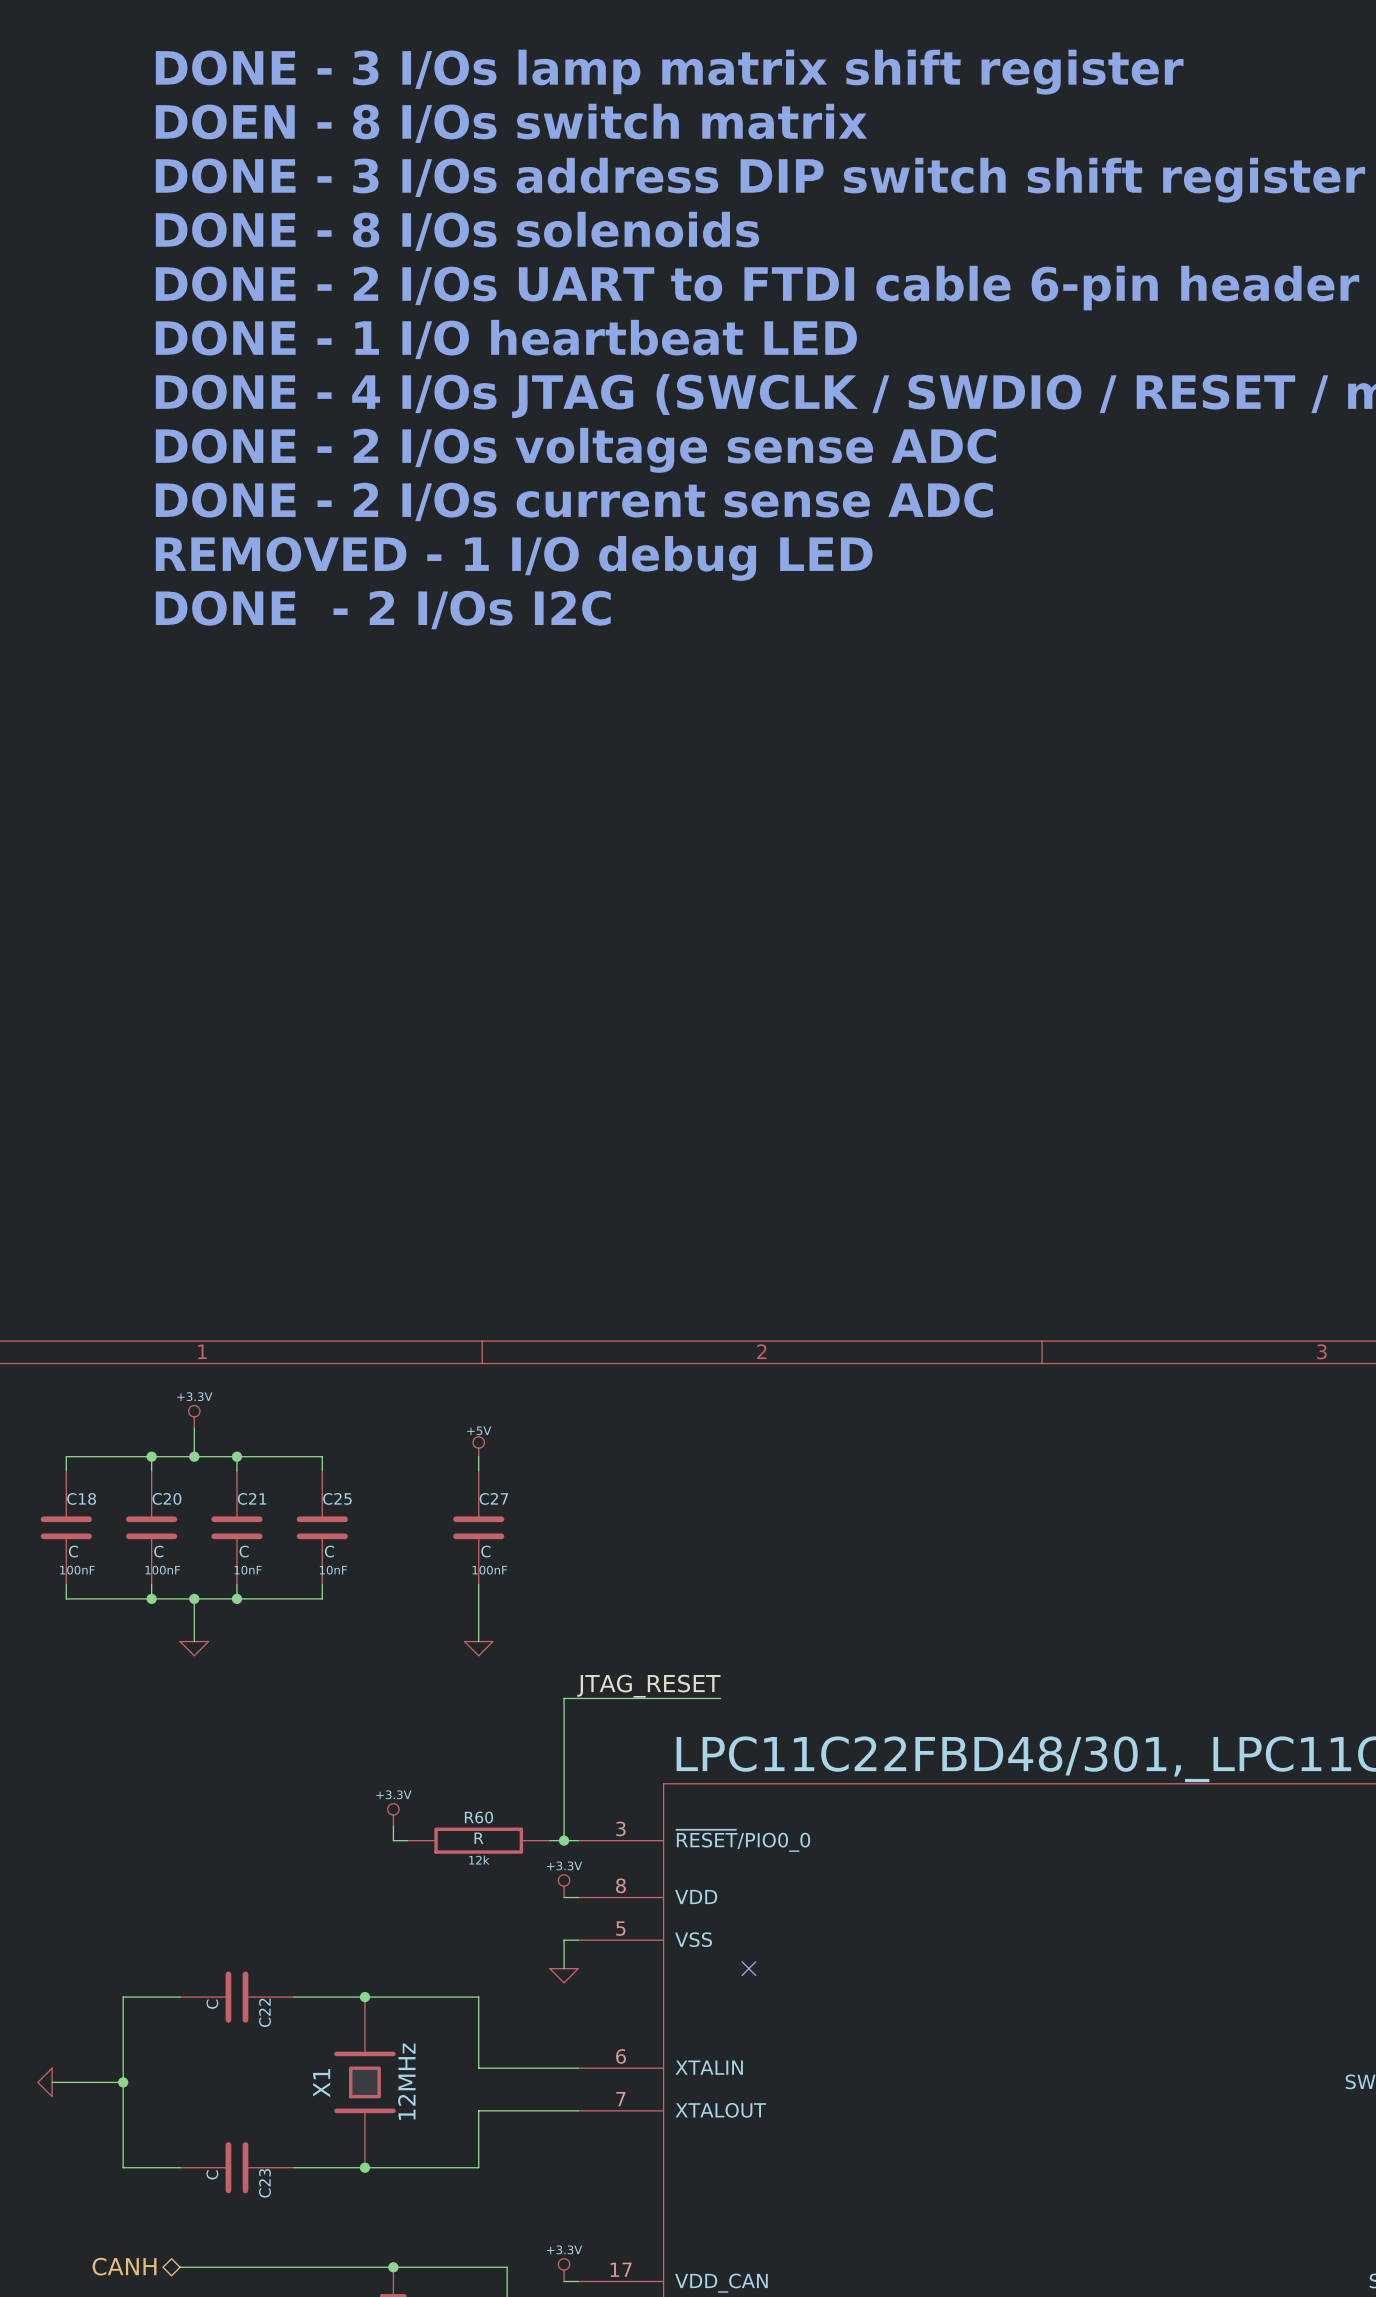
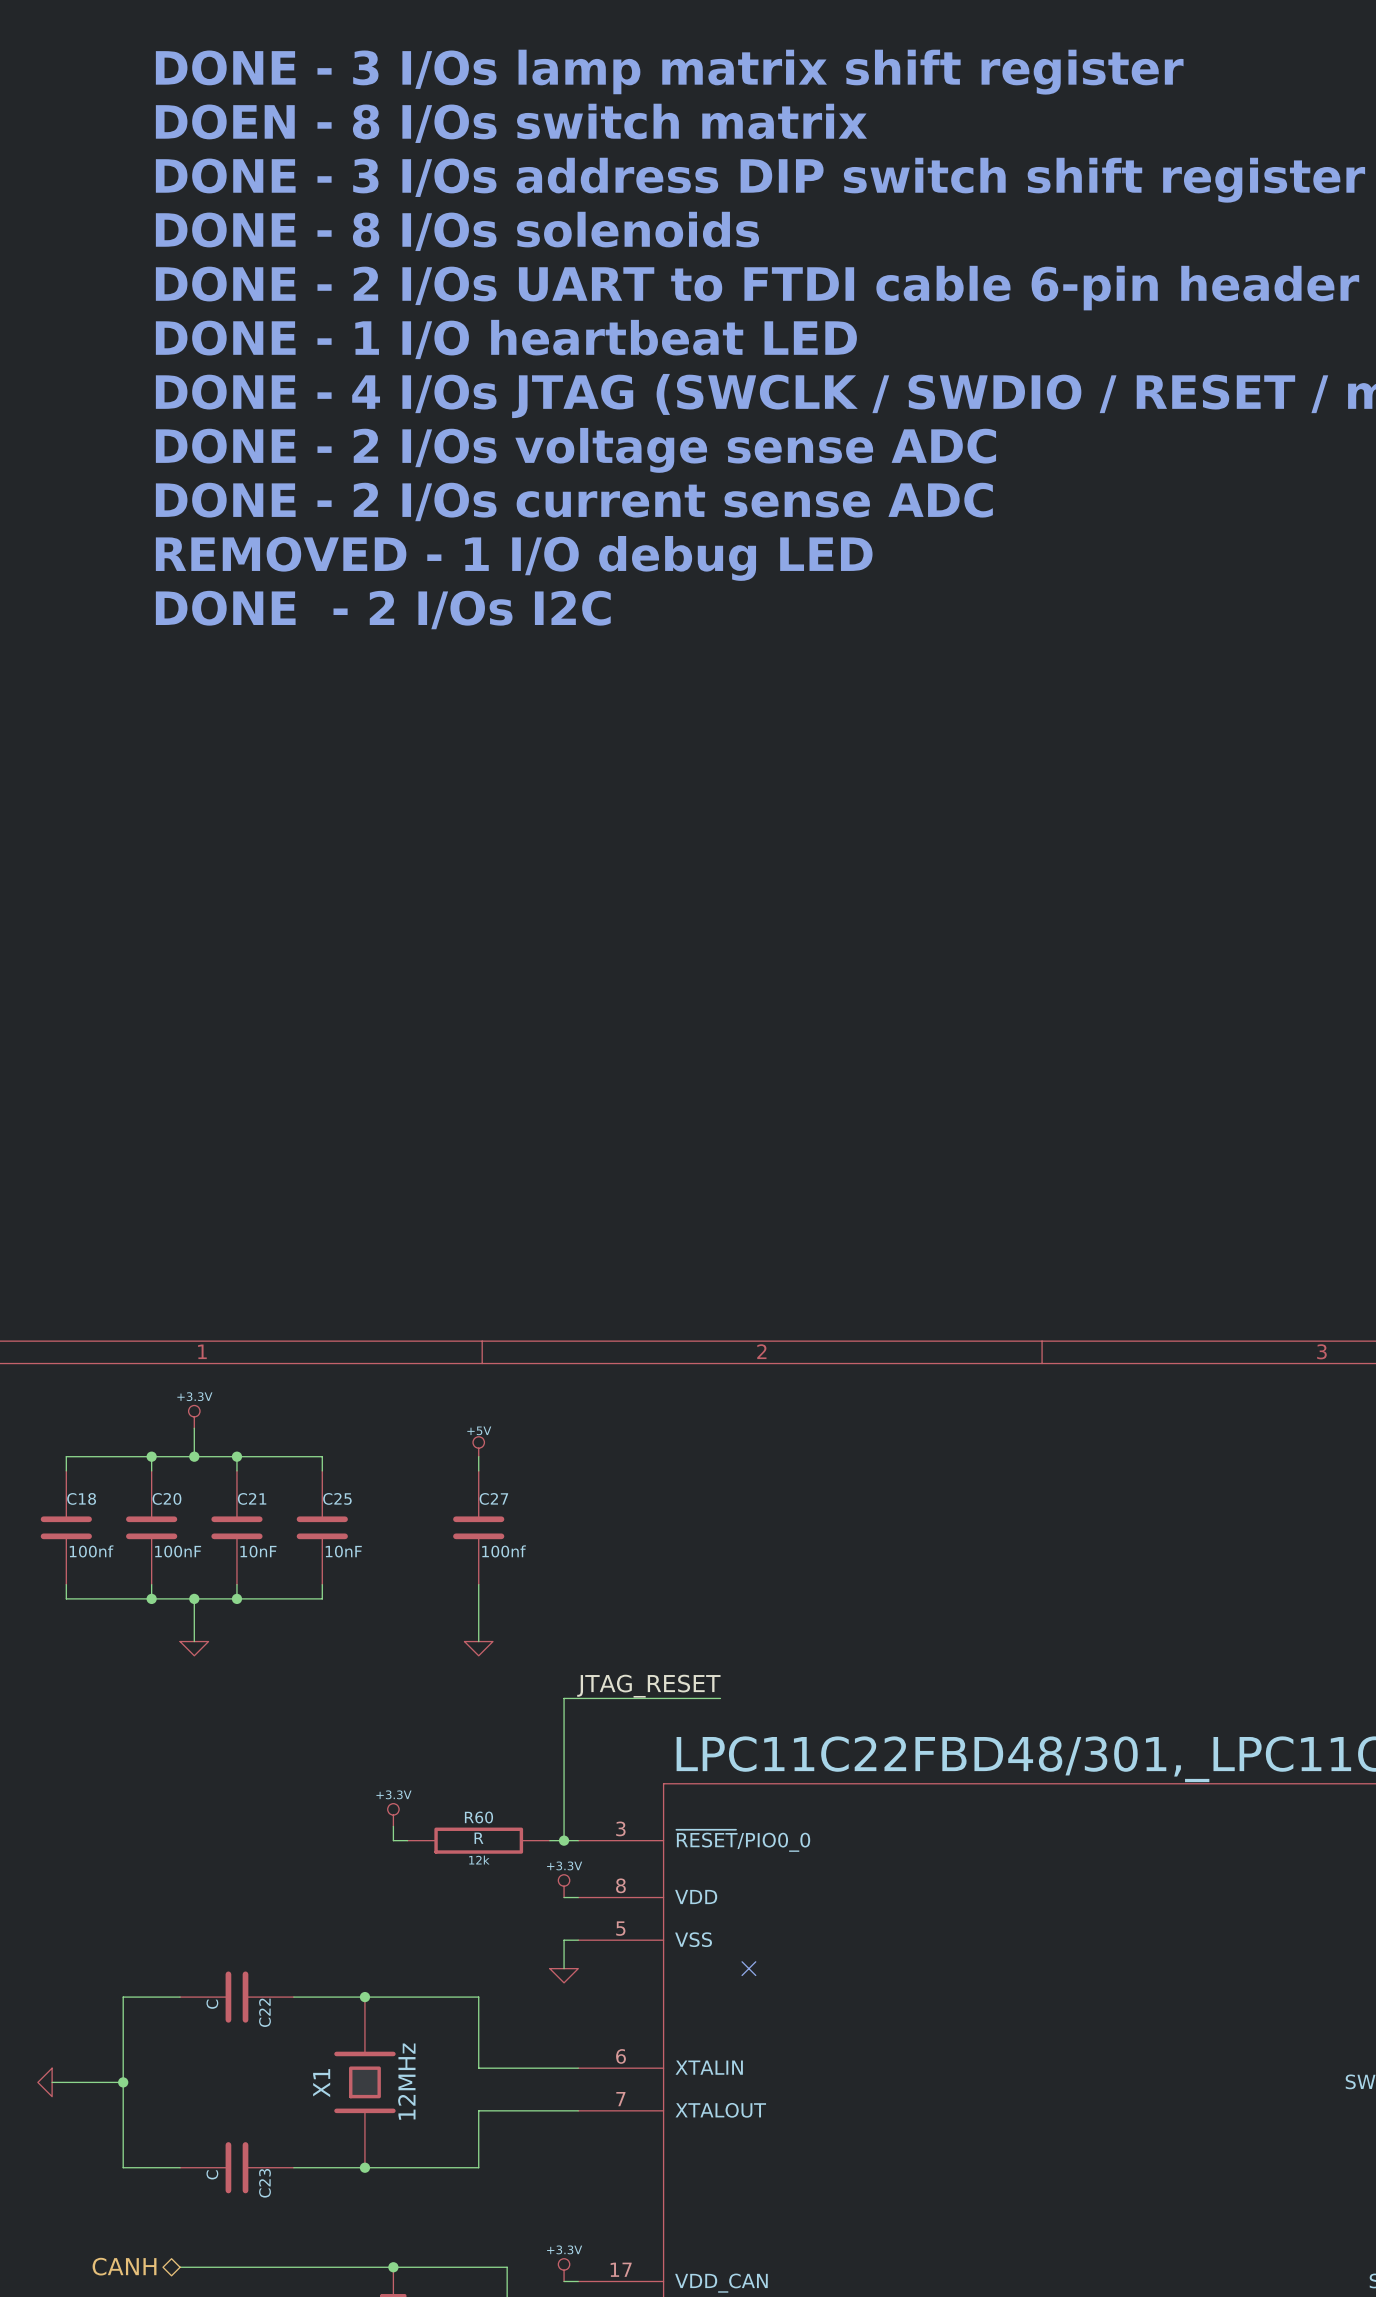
C18 value: C (73, 1551) -> 100nf (91, 1551)
C20 value: C (158, 1551) -> 100nF (178, 1551)
C21 value: C (244, 1551) -> 10nF (258, 1551)
C25 value: C (329, 1551) -> 10nF (343, 1551)
C27 value: C (485, 1551) -> 100nf (504, 1551)
C18 text: 100nF (77, 1570) -> none
C20 text: 100nF (162, 1570) -> none
C21 text: 10nF (248, 1570) -> none
C25 text: 10nF (333, 1570) -> none
C27 text: 100nF (489, 1570) -> none

